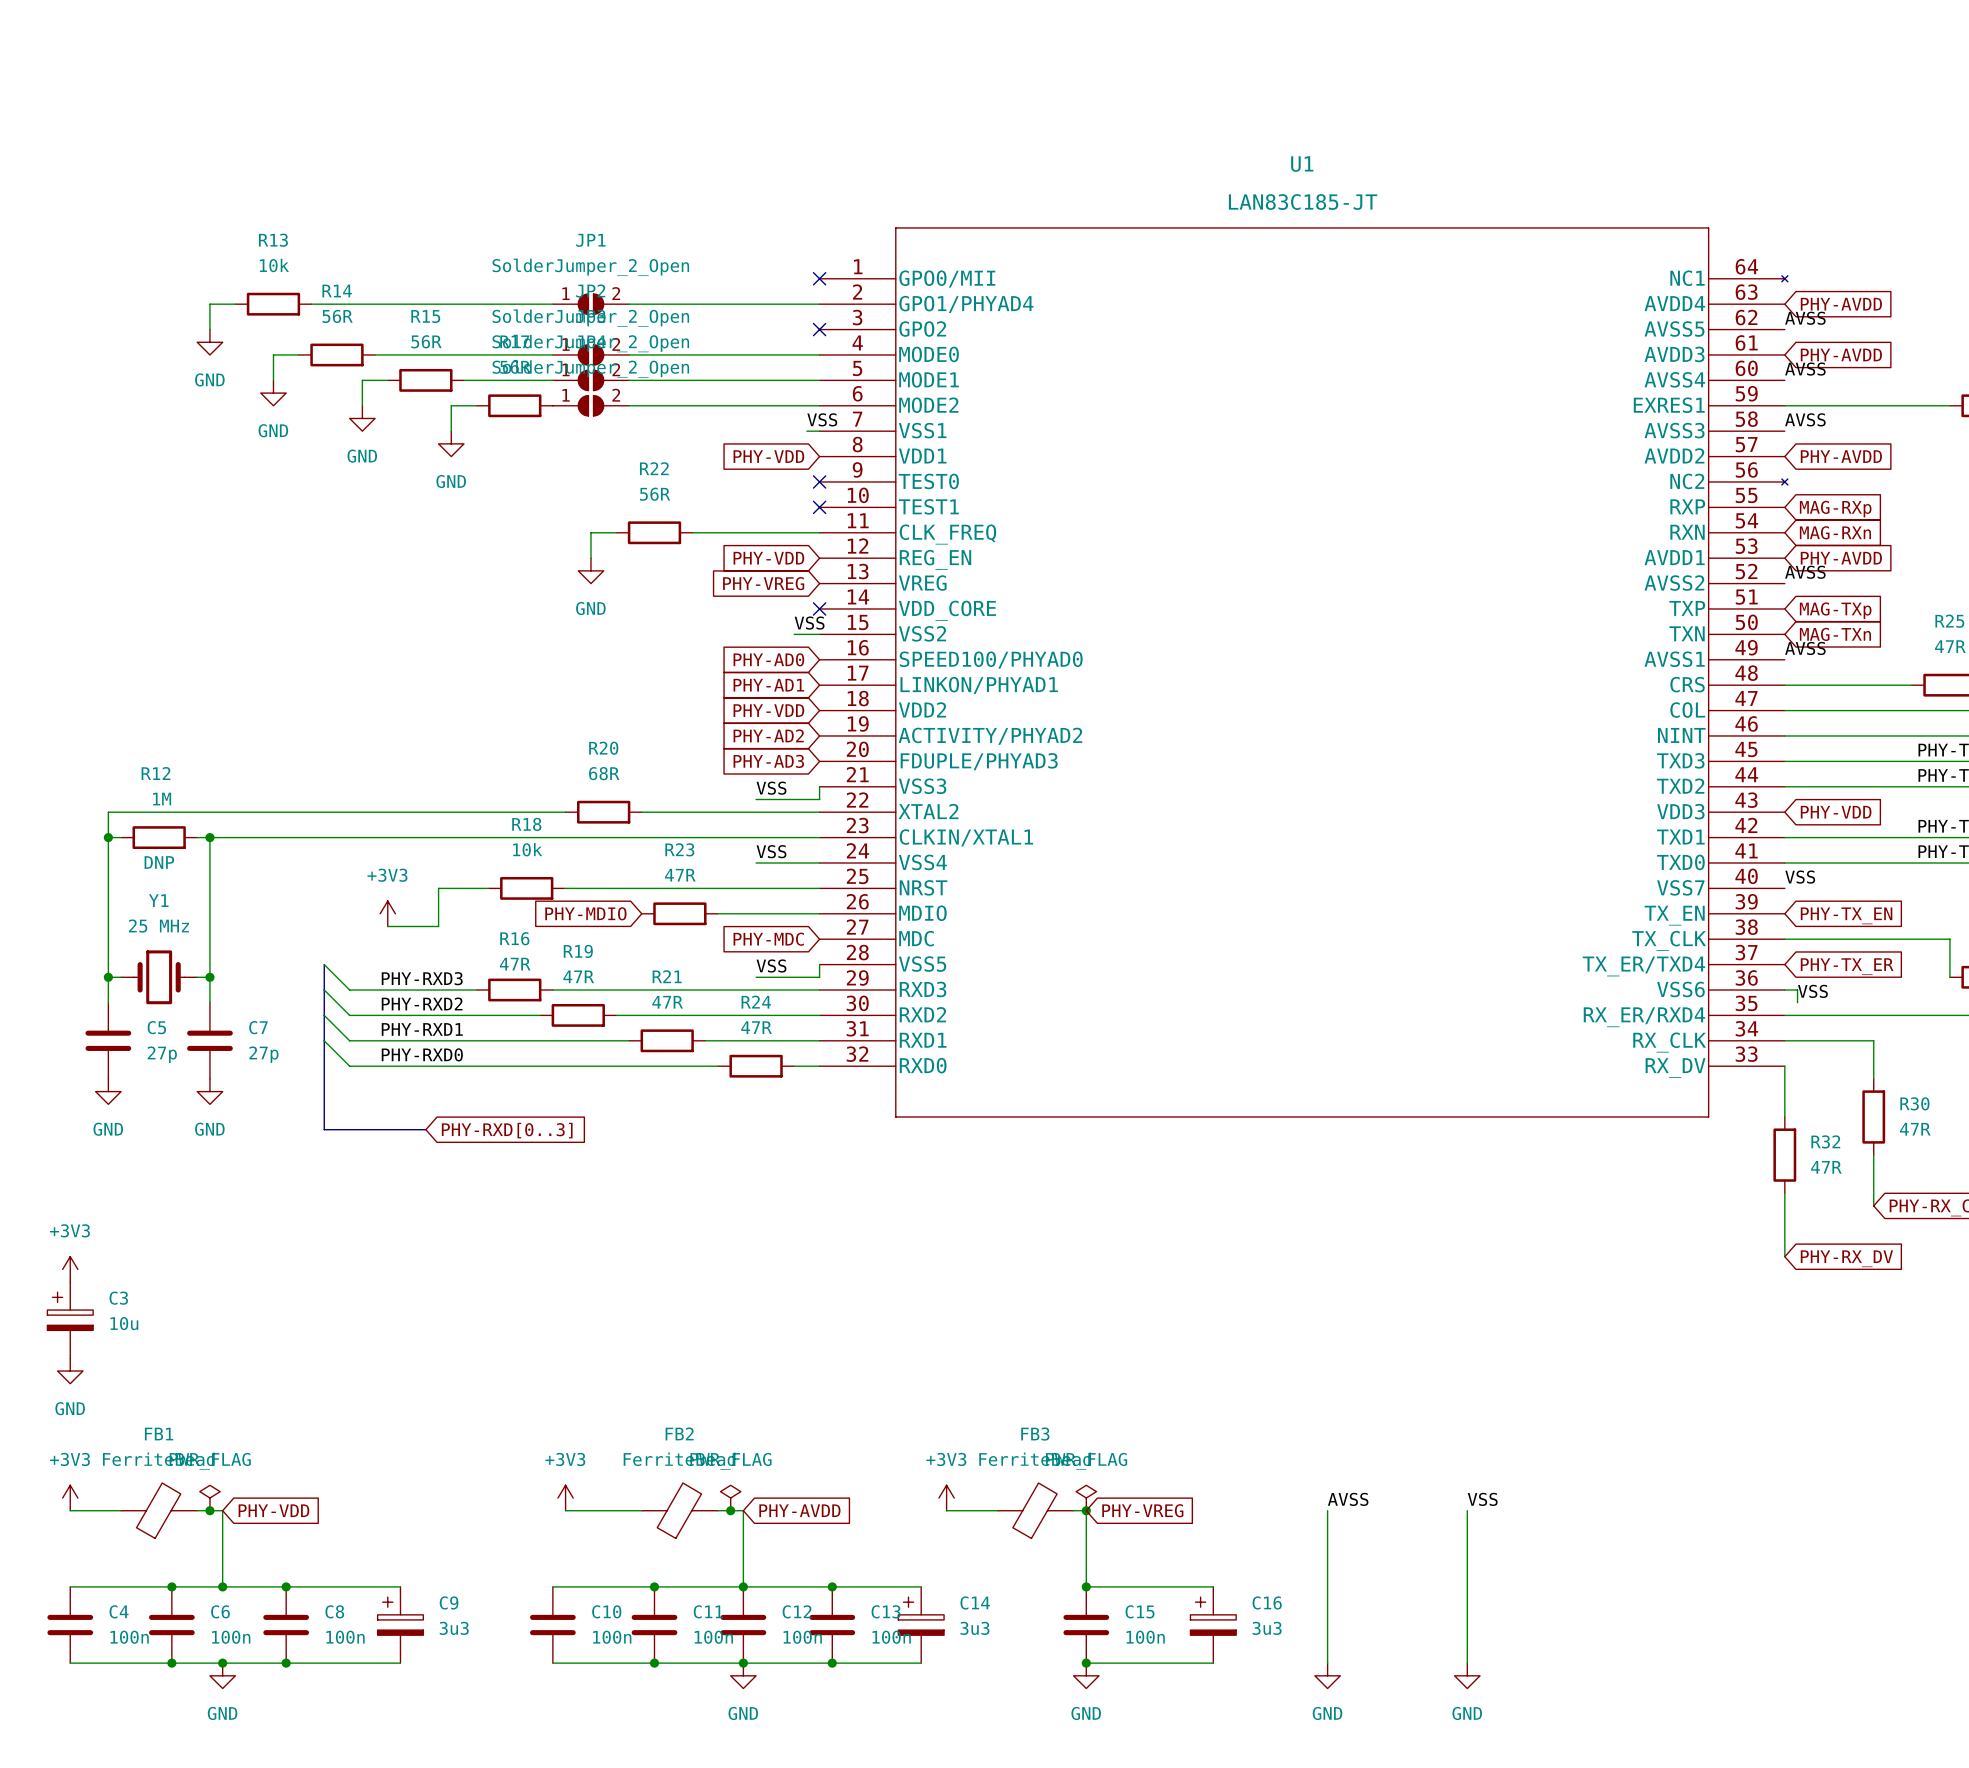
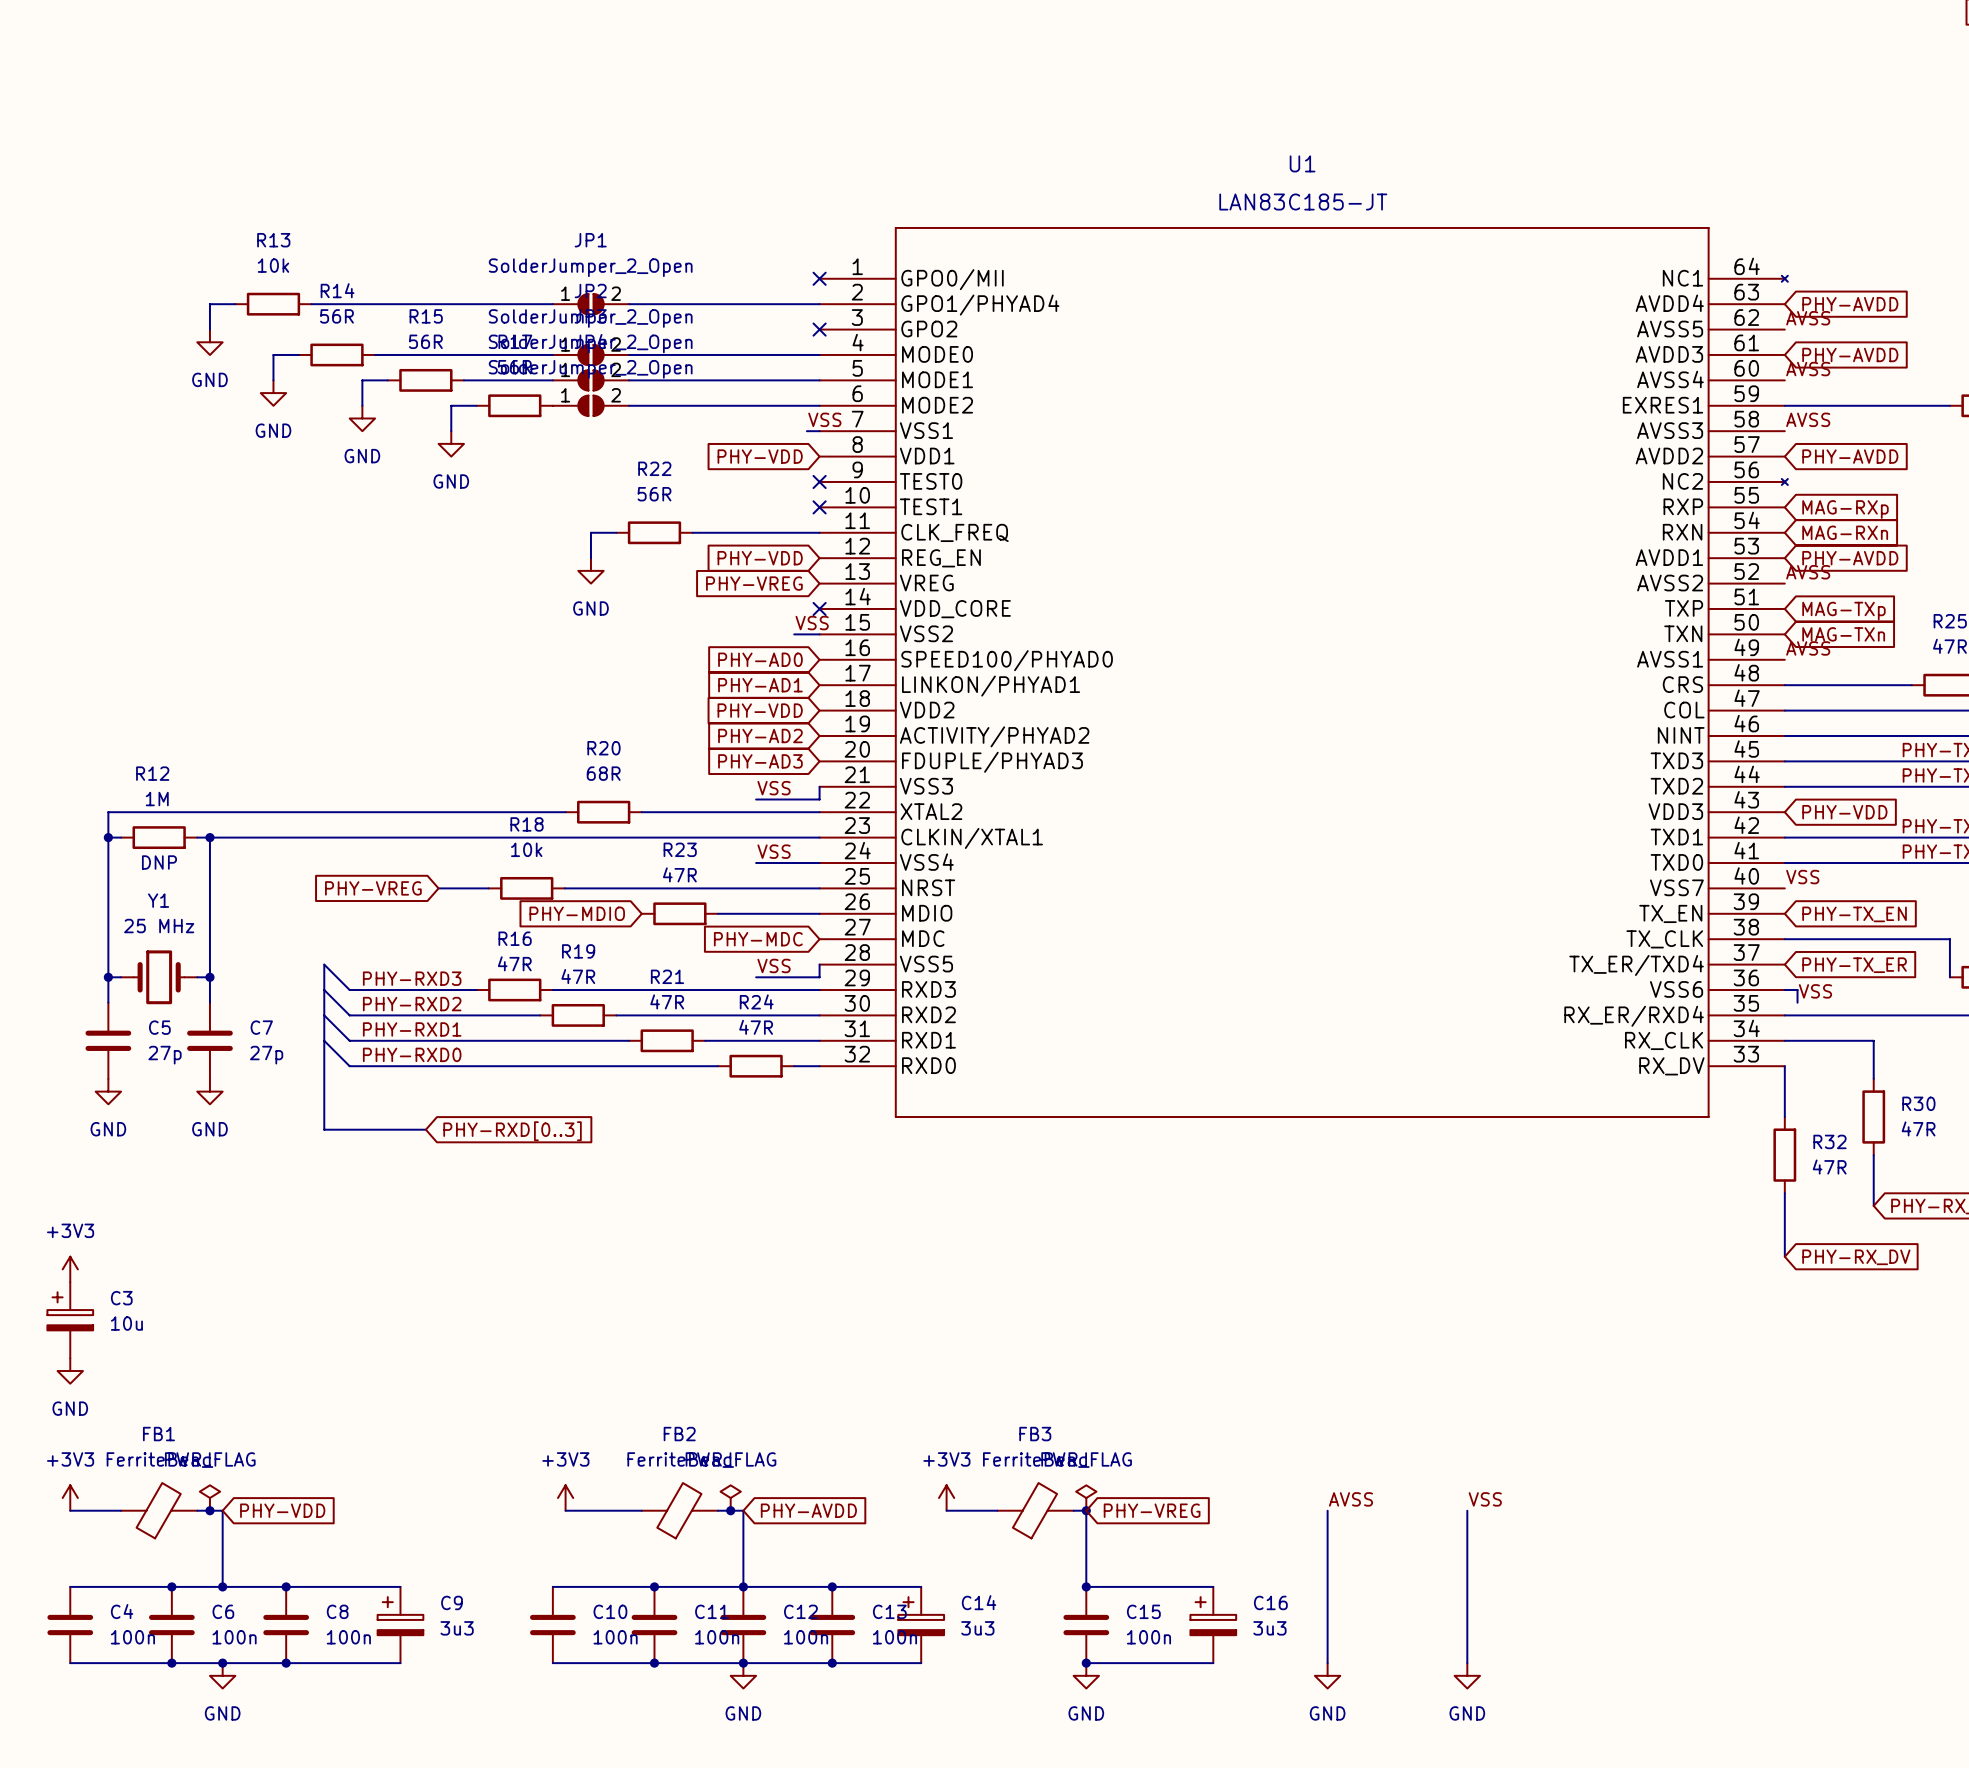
global label: none -> PHY-VREG (373, 888)
wire: (438, 888) (438, 926) (387, 926) -> none
power symbol: +3V3 (387, 913) -> none

